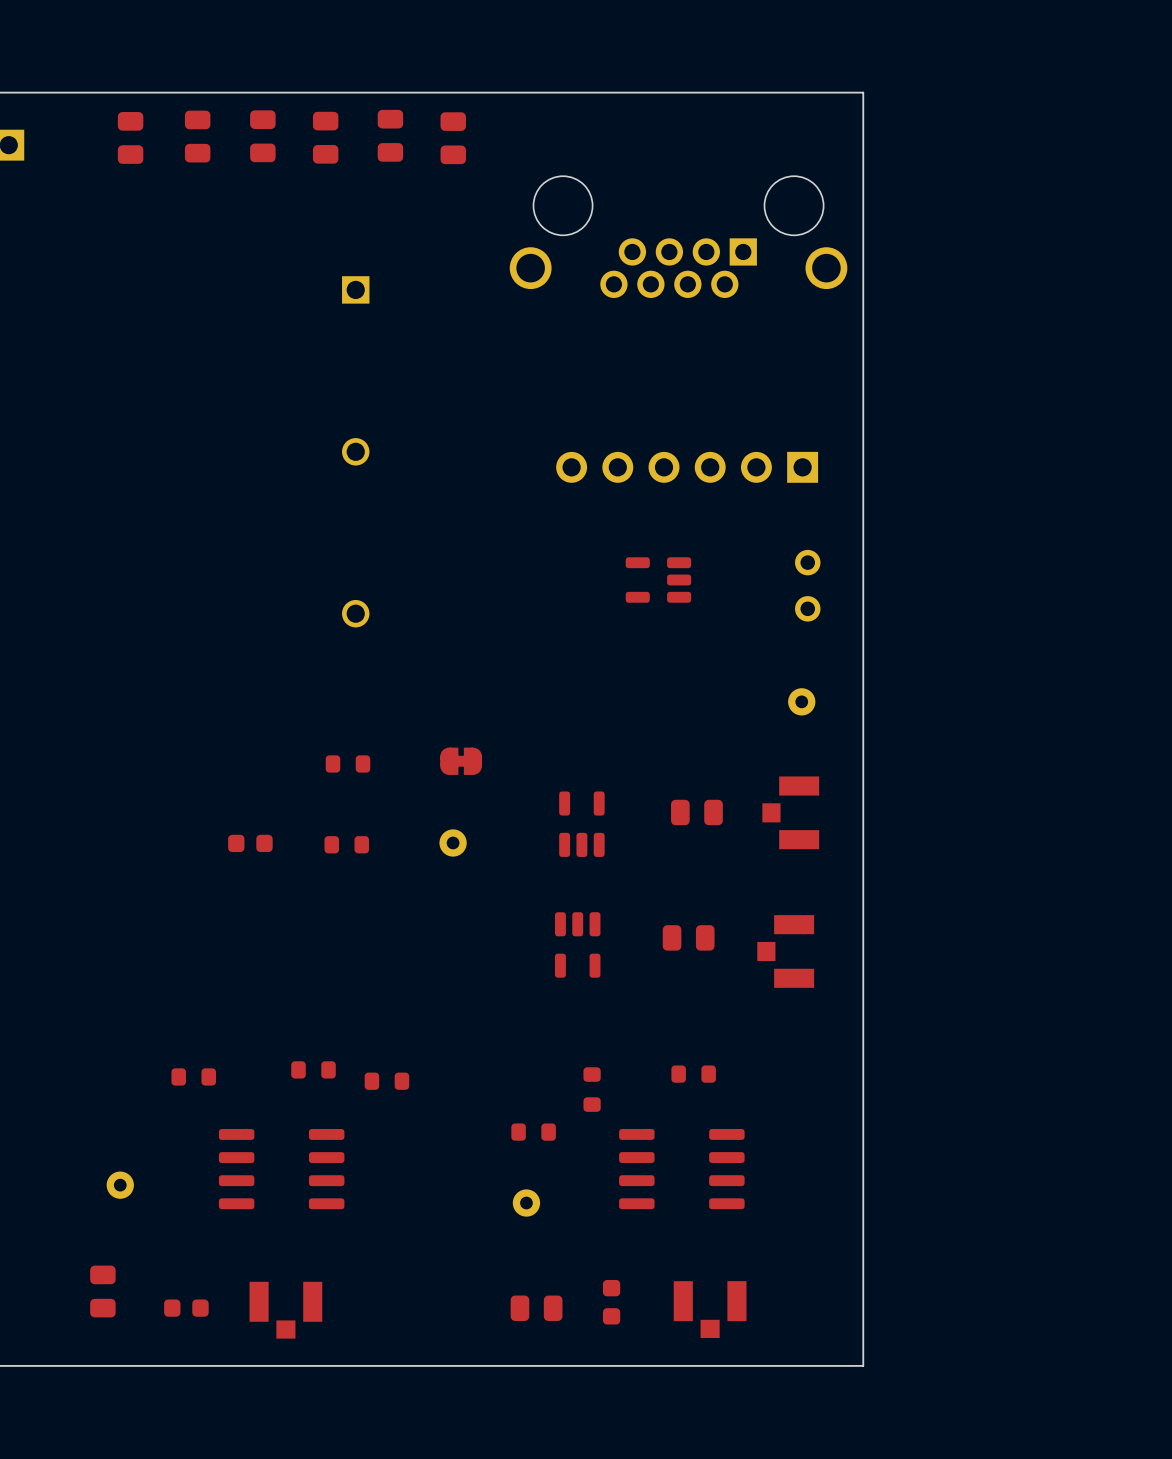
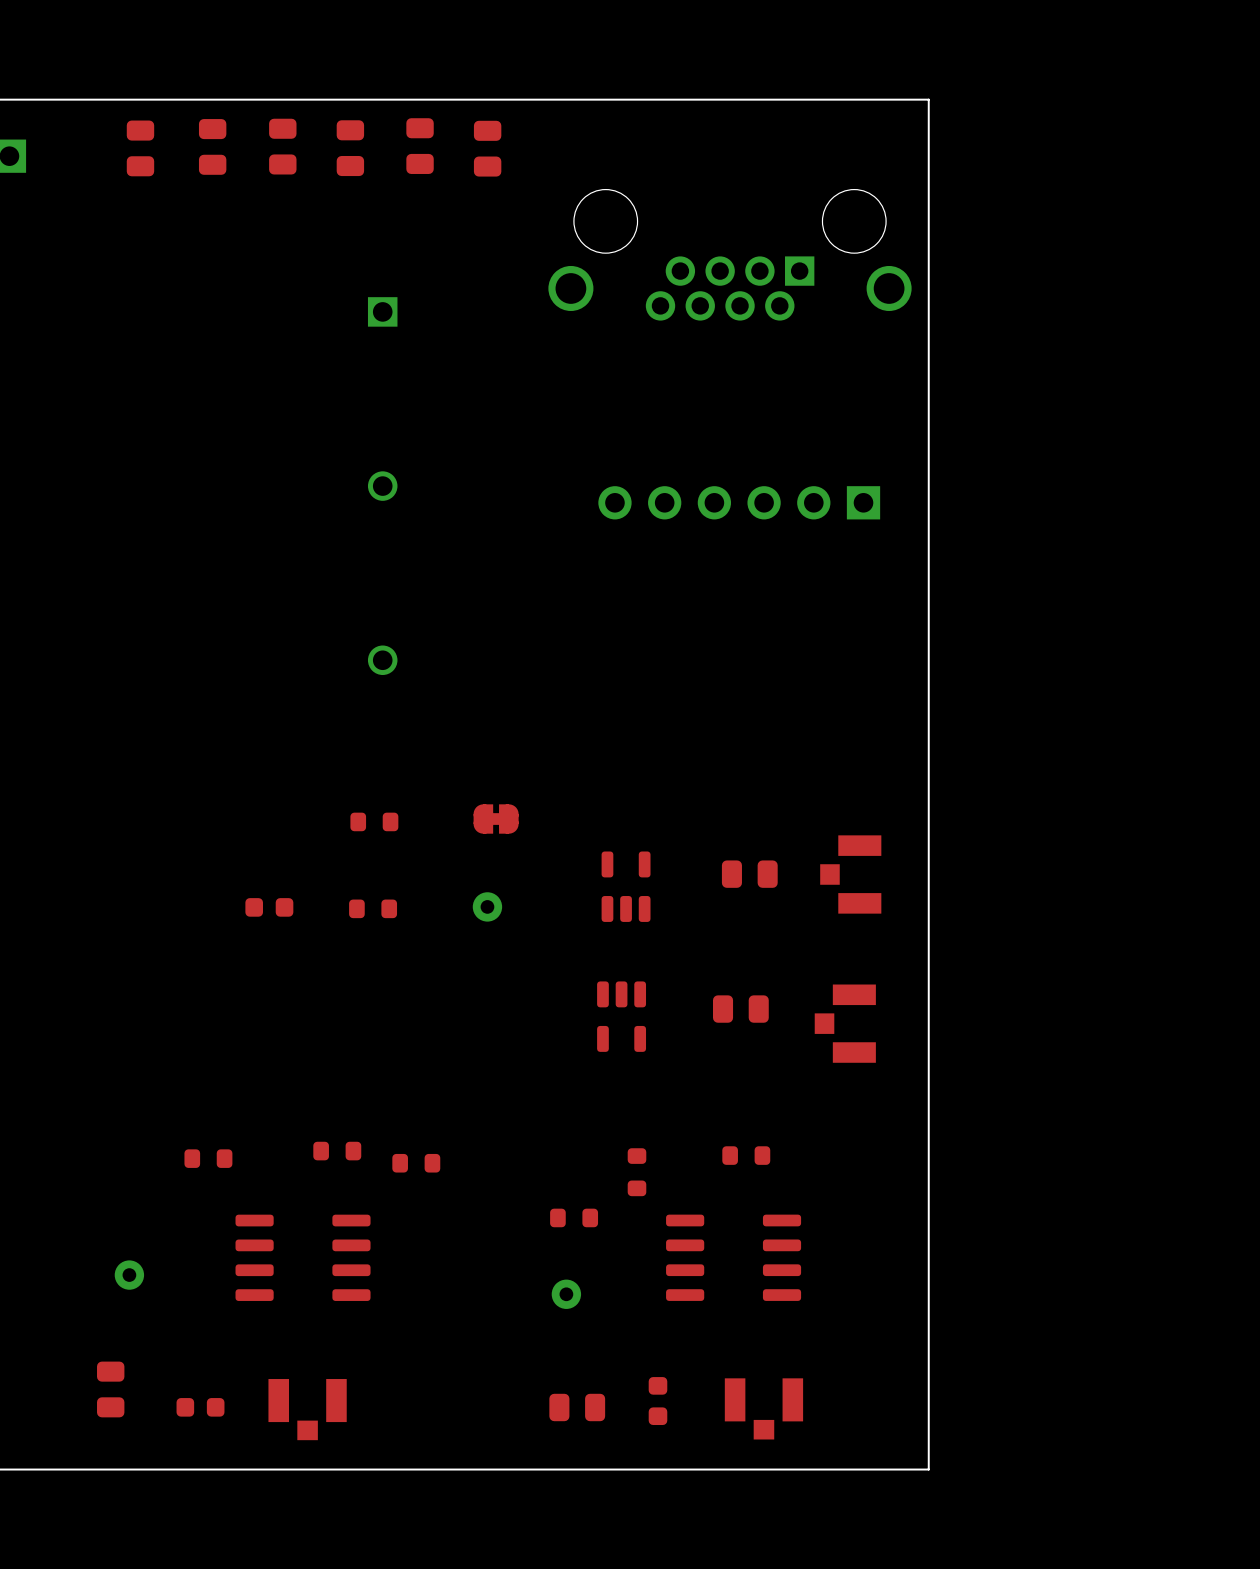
part: (658, 580) -> none
part: (807, 585) -> none
part: (801, 701) -> none

